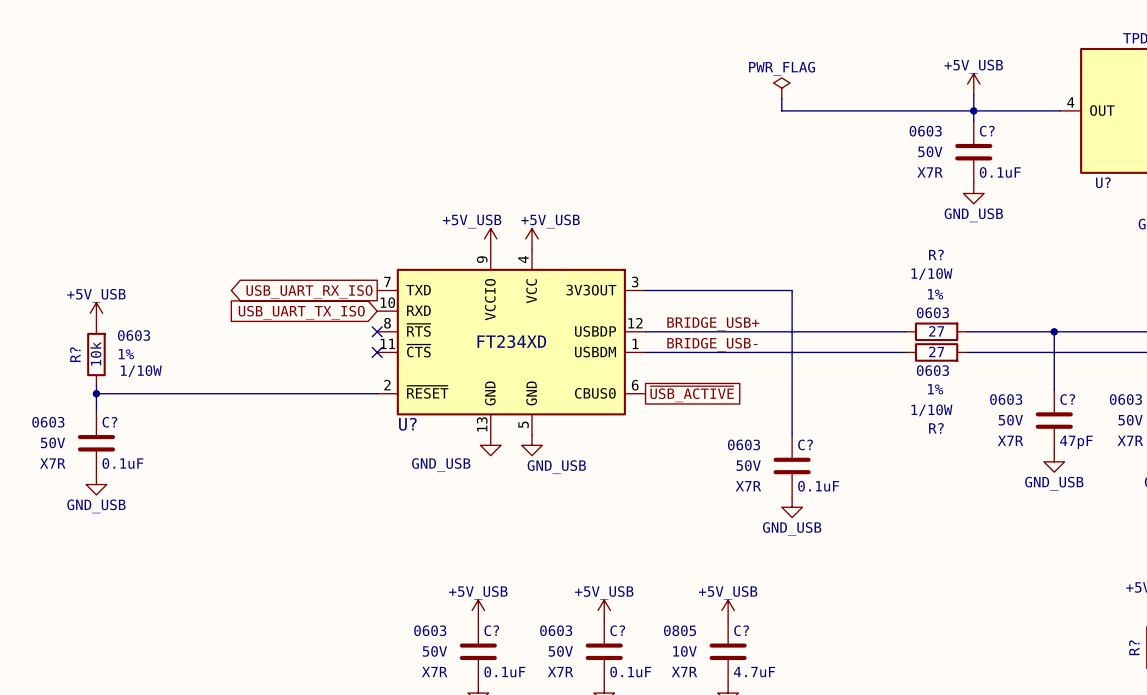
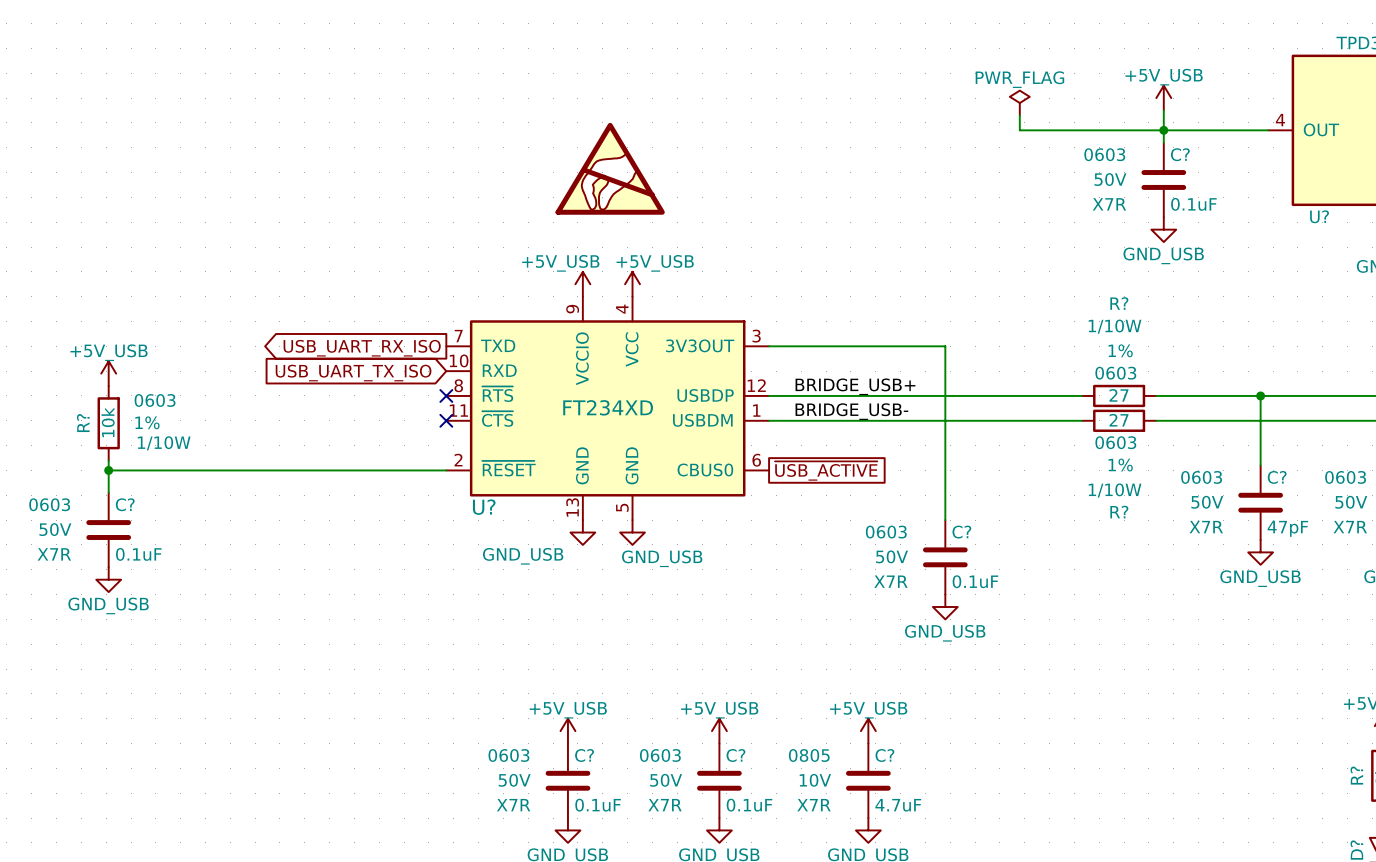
power symbol position: PWR_FLAG (781, 88) -> PWR_FLAG (1019, 103)
wire: (781, 98) (781, 110) (854, 110) -> (1019, 115) (1019, 130)
power symbol: none -> (610, 168)

